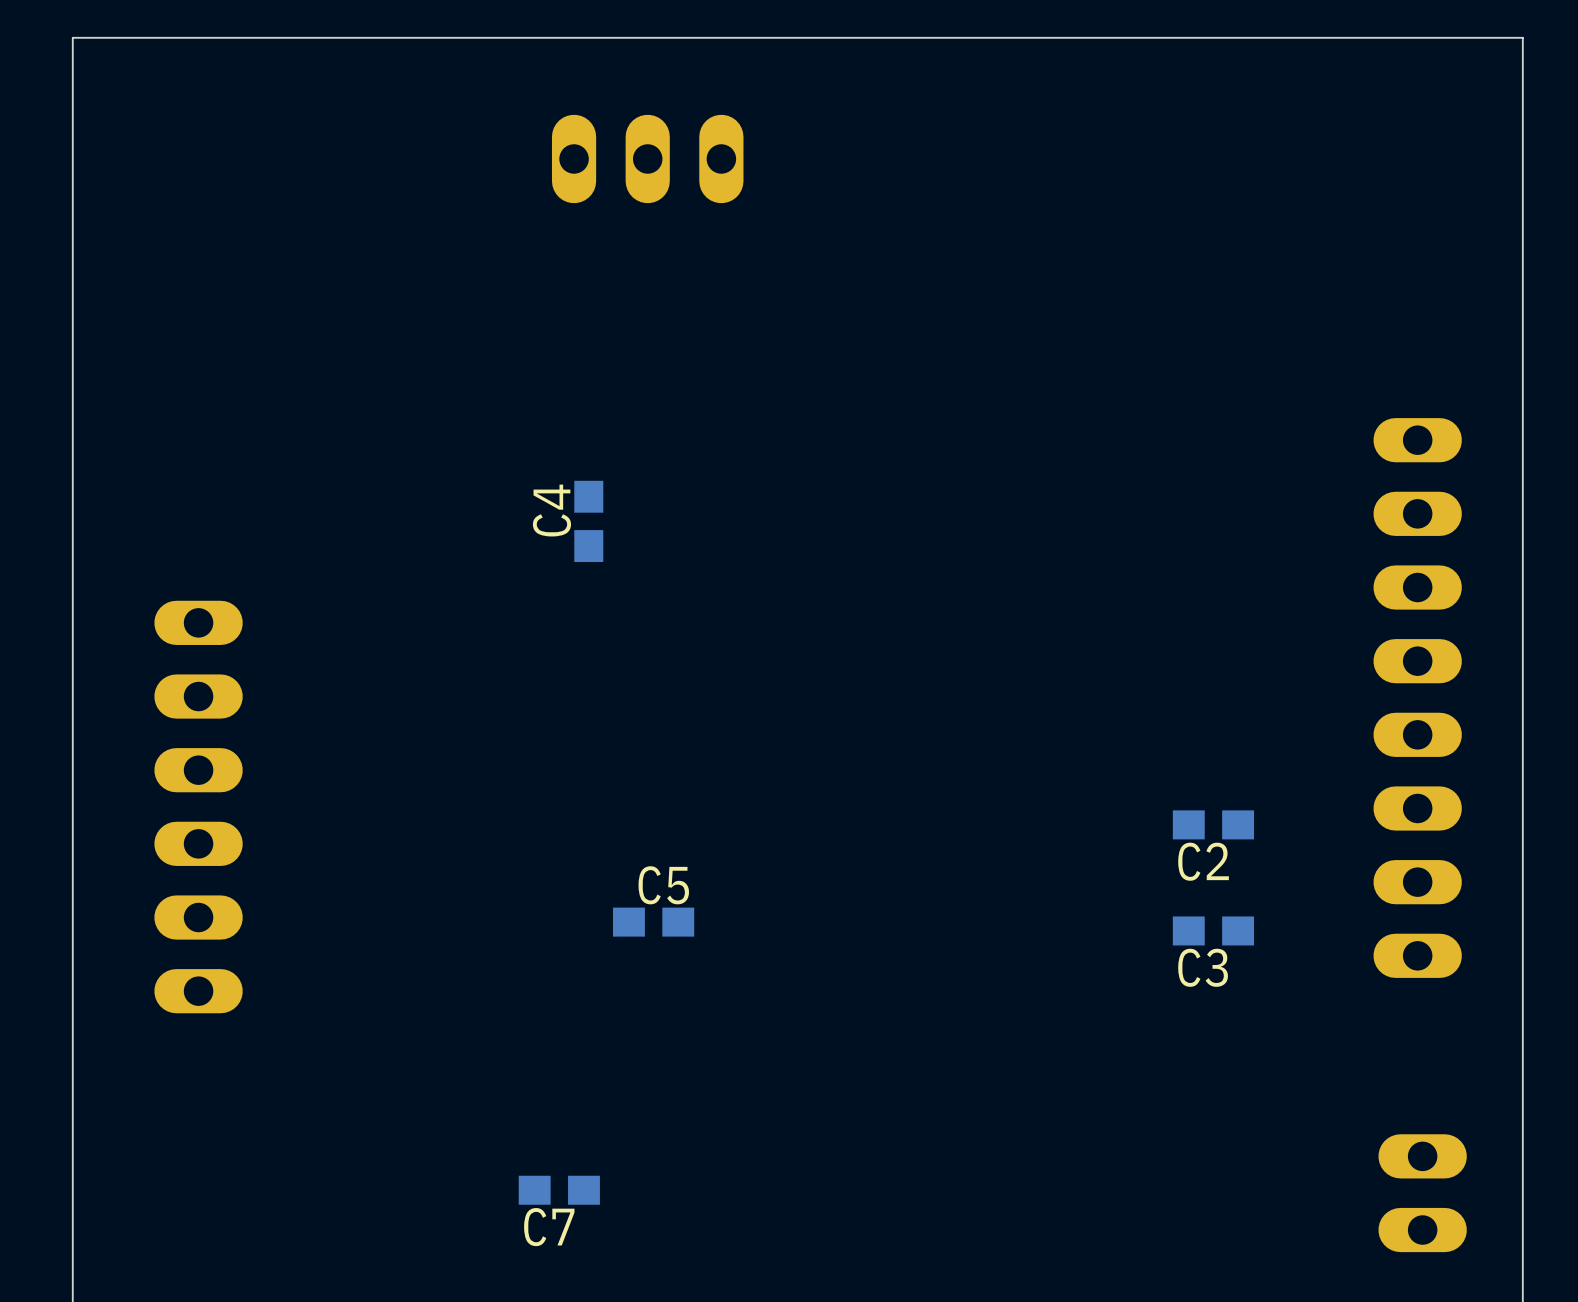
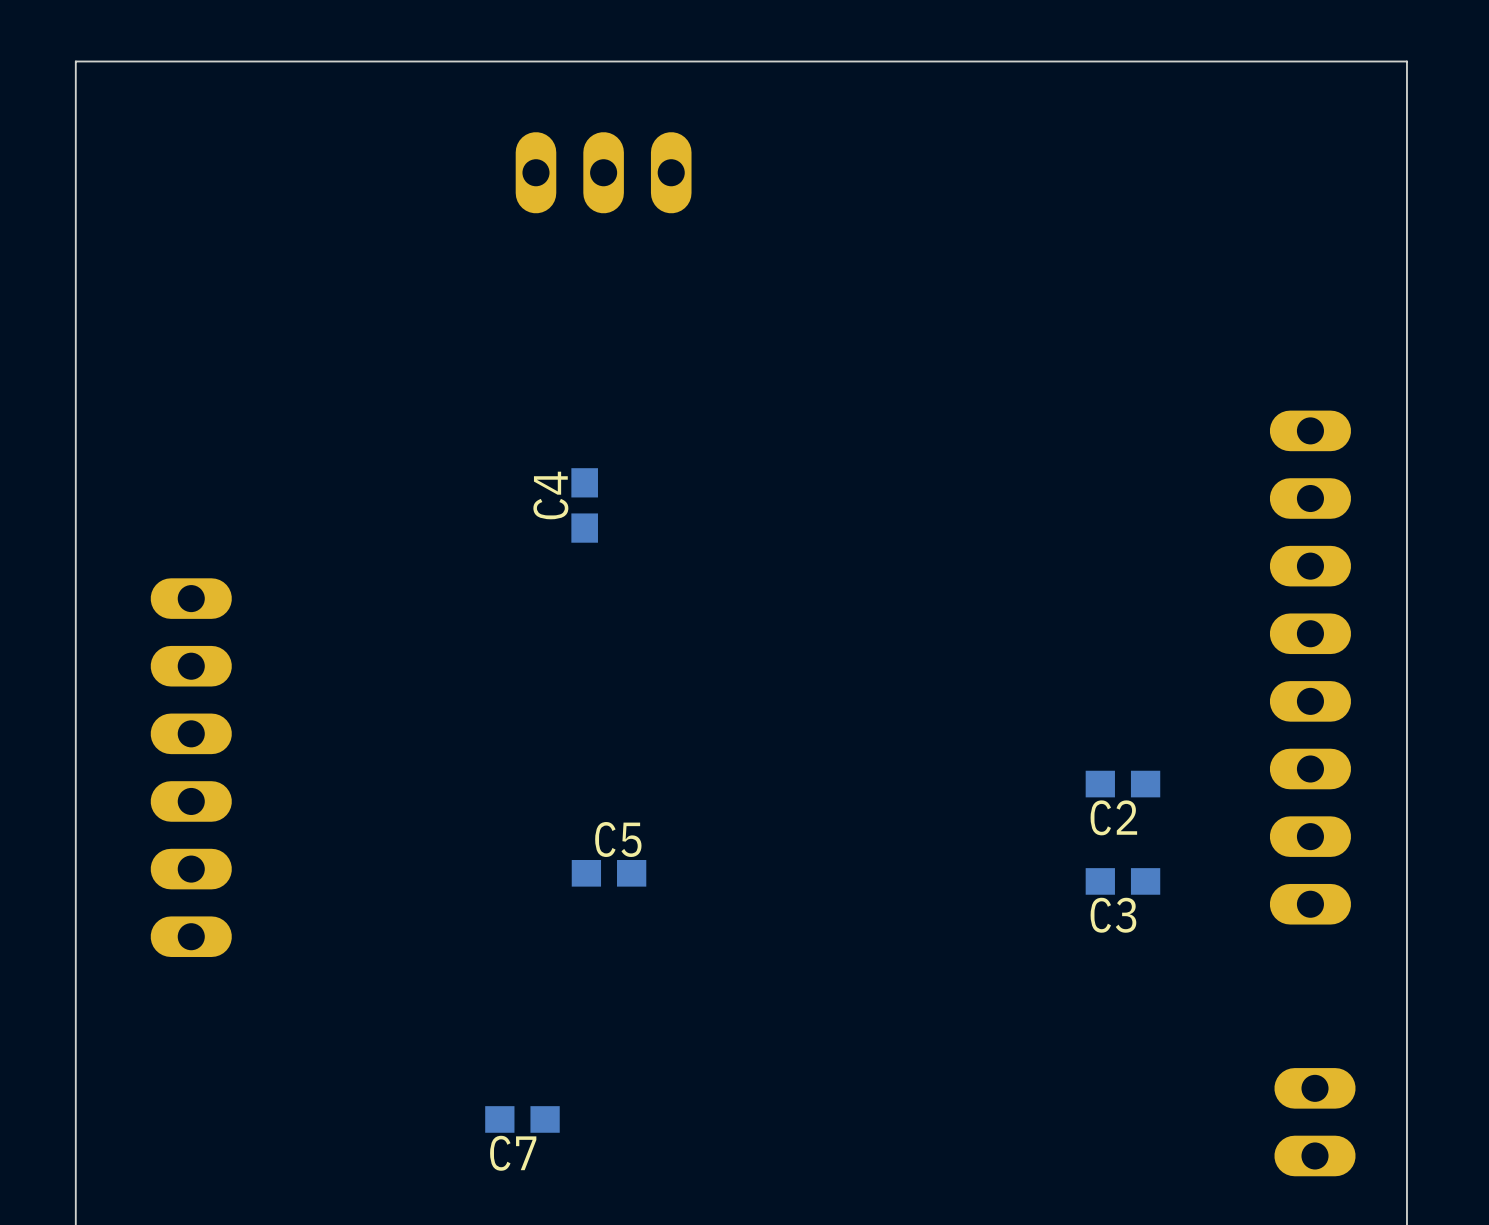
C4 position: (588, 521) -> (584, 505)

